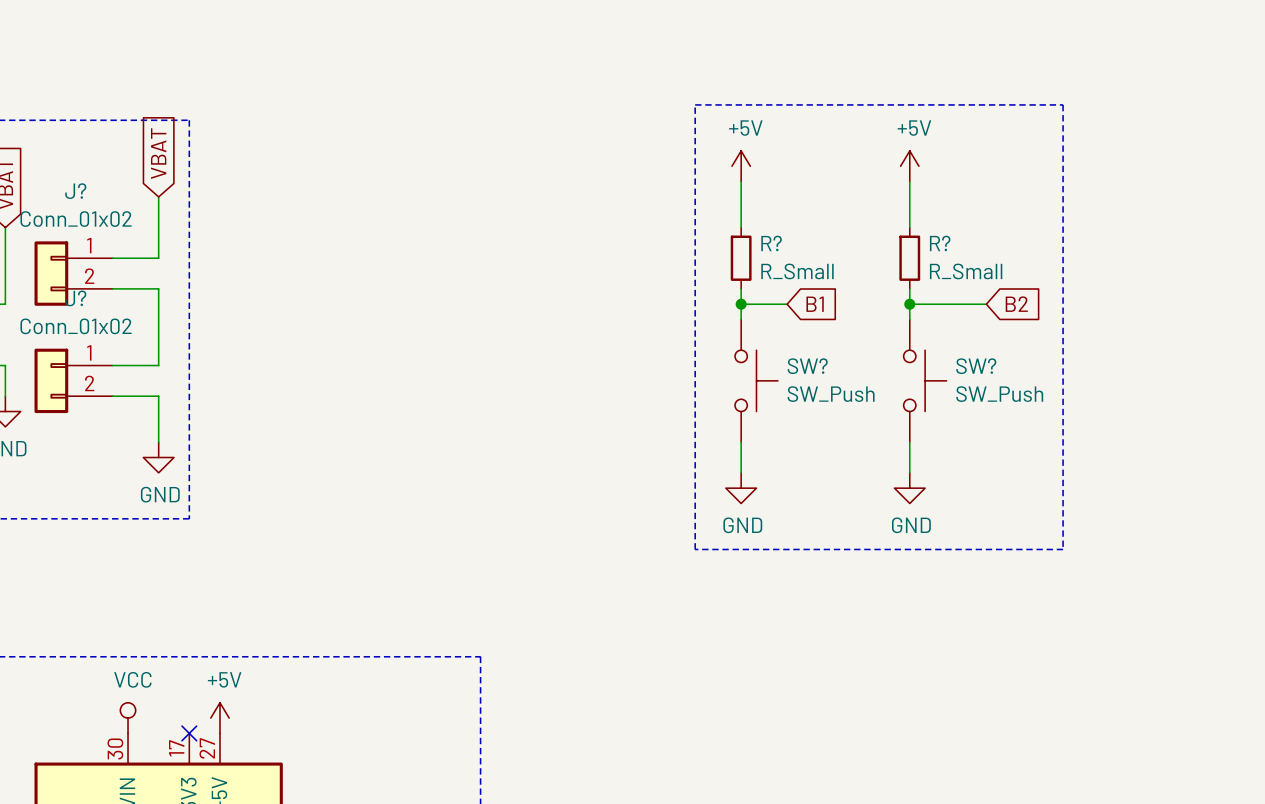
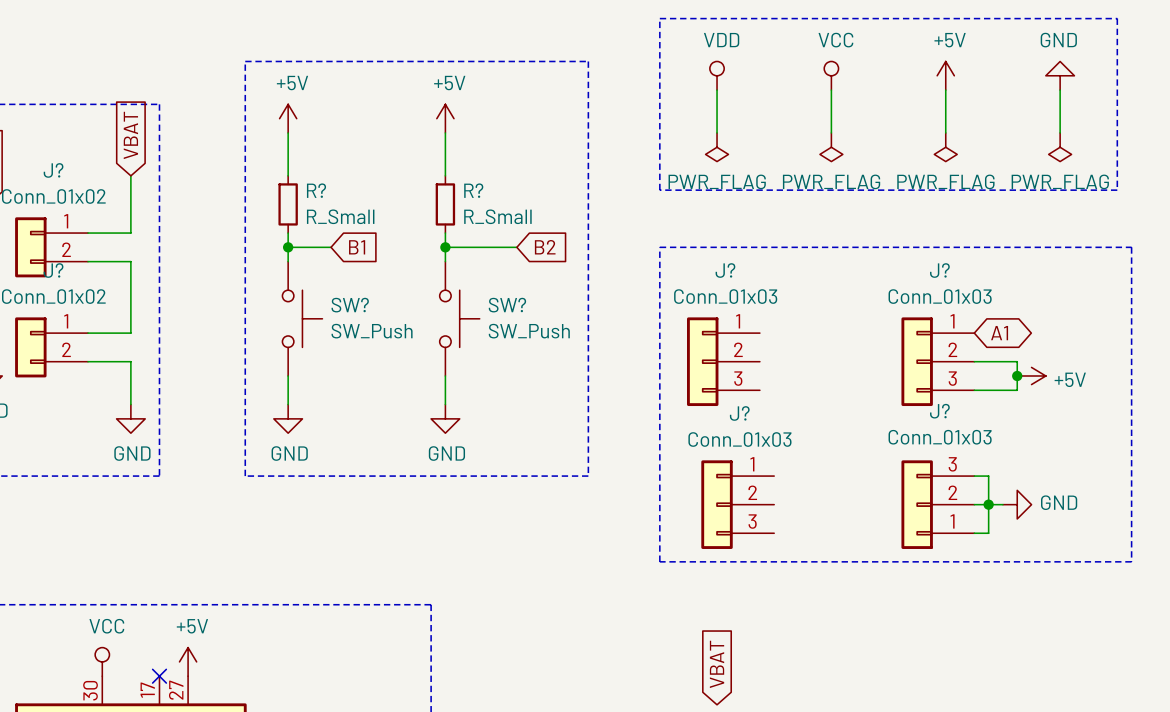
line: none -> (659, 18) (659, 190) (1117, 190) (1117, 18) (659, 18)
line: none -> (245, 61) (245, 476) (588, 476) (588, 61) (245, 61)
power symbol: none -> VDD (717, 75)
power symbol: none -> VCC (831, 75)
power symbol: none -> +5V (945, 75)
power symbol: none -> GND (1060, 75)
line: (695, 104) (695, 549) (1063, 549) (1063, 104) (695, 104) -> none
wire: none -> (717, 90) (717, 132)
wire: none -> (945, 90) (945, 132)
wire: none -> (1060, 90) (1060, 132)
power symbol: none -> +5V (288, 118)
power symbol: none -> +5V (445, 118)
wire: none -> (288, 132) (288, 175)
power symbol: +5V (741, 166) -> none
power symbol: none -> PWR_FLAG (717, 147)
power symbol: +5V (909, 166) -> PWR_FLAG (831, 147)
power symbol: none -> PWR_FLAG (945, 147)
power symbol: none -> PWR_FLAG (1060, 147)
wire: (741, 181) (741, 227) -> (445, 132) (445, 175)
wire: (909, 181) (909, 227) -> (831, 90) (831, 132)
R?: none -> R_Small (288, 204)
R?: none -> R_Small (445, 204)
wire: none -> (288, 233) (288, 261)
R?: R_Small (741, 258) -> none
R?: R_Small (909, 258) -> none
wire: none -> (288, 247) (331, 247)
junction: none -> (288, 247)
global label: none -> B1 (357, 247)
wire: none -> (445, 247) (516, 247)
junction: none -> (445, 247)
global label: none -> B2 (545, 247)
line: none -> (659, 247) (659, 561) (1131, 561) (1131, 247) (659, 247)
wire: (741, 288) (741, 319) -> (445, 233) (445, 261)
wire: (909, 288) (909, 319) -> none
wire: (741, 304) (787, 304) -> none
junction: (741, 304) -> none
global label: B1 (815, 304) -> none
wire: (909, 304) (986, 304) -> none
junction: (909, 304) -> none
global label: B2 (1016, 304) -> none
SW?: none -> SW_Push (302, 318)
SW?: none -> SW_Push (459, 318)
global label: none -> A1 (999, 333)
SW?: SW_Push (756, 380) -> none
SW?: SW_Push (925, 380) -> none
J?: none -> Conn_01x03 (723, 361)
J?: none -> Conn_01x03 (937, 361)
wire: none -> (974, 361) (1017, 361) (1017, 390) (974, 390)
wire: none -> (288, 375) (288, 404)
junction: none -> (1017, 375)
power symbol: none -> +5V (1031, 375)
wire: (741, 442) (741, 472) -> (445, 375) (445, 404)
wire: (909, 442) (909, 472) -> none
power symbol: none -> GND (288, 418)
power symbol: none -> GND (445, 418)
power symbol: GND (741, 488) -> none
power symbol: GND (909, 488) -> none
wire: none -> (974, 476) (988, 476) (988, 533) (974, 533)
J?: none -> Conn_01x03 (737, 504)
J?: none -> Conn_01x03 (937, 504)
wire: none -> (974, 504) (1002, 504)
junction: none -> (988, 504)
power symbol: none -> GND (1017, 504)
global label: none -> VBAT (717, 664)

